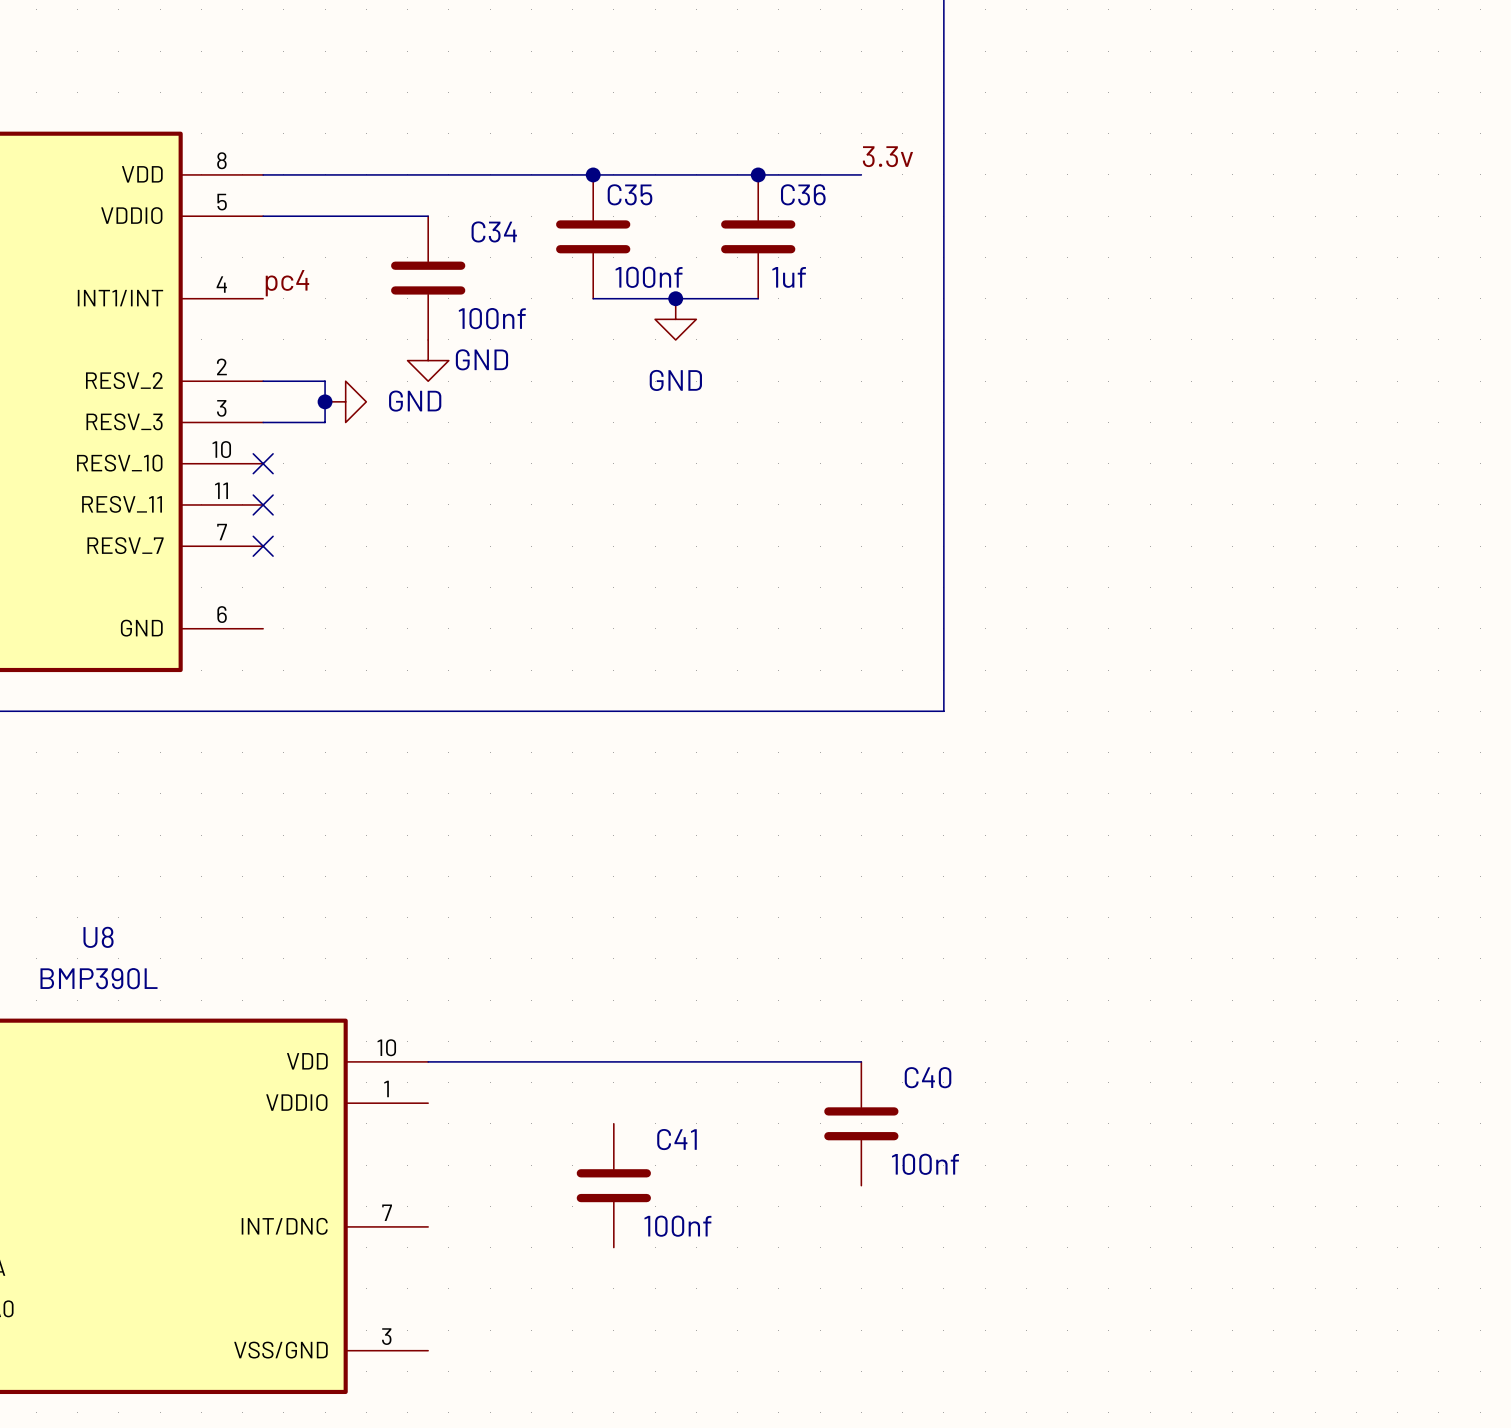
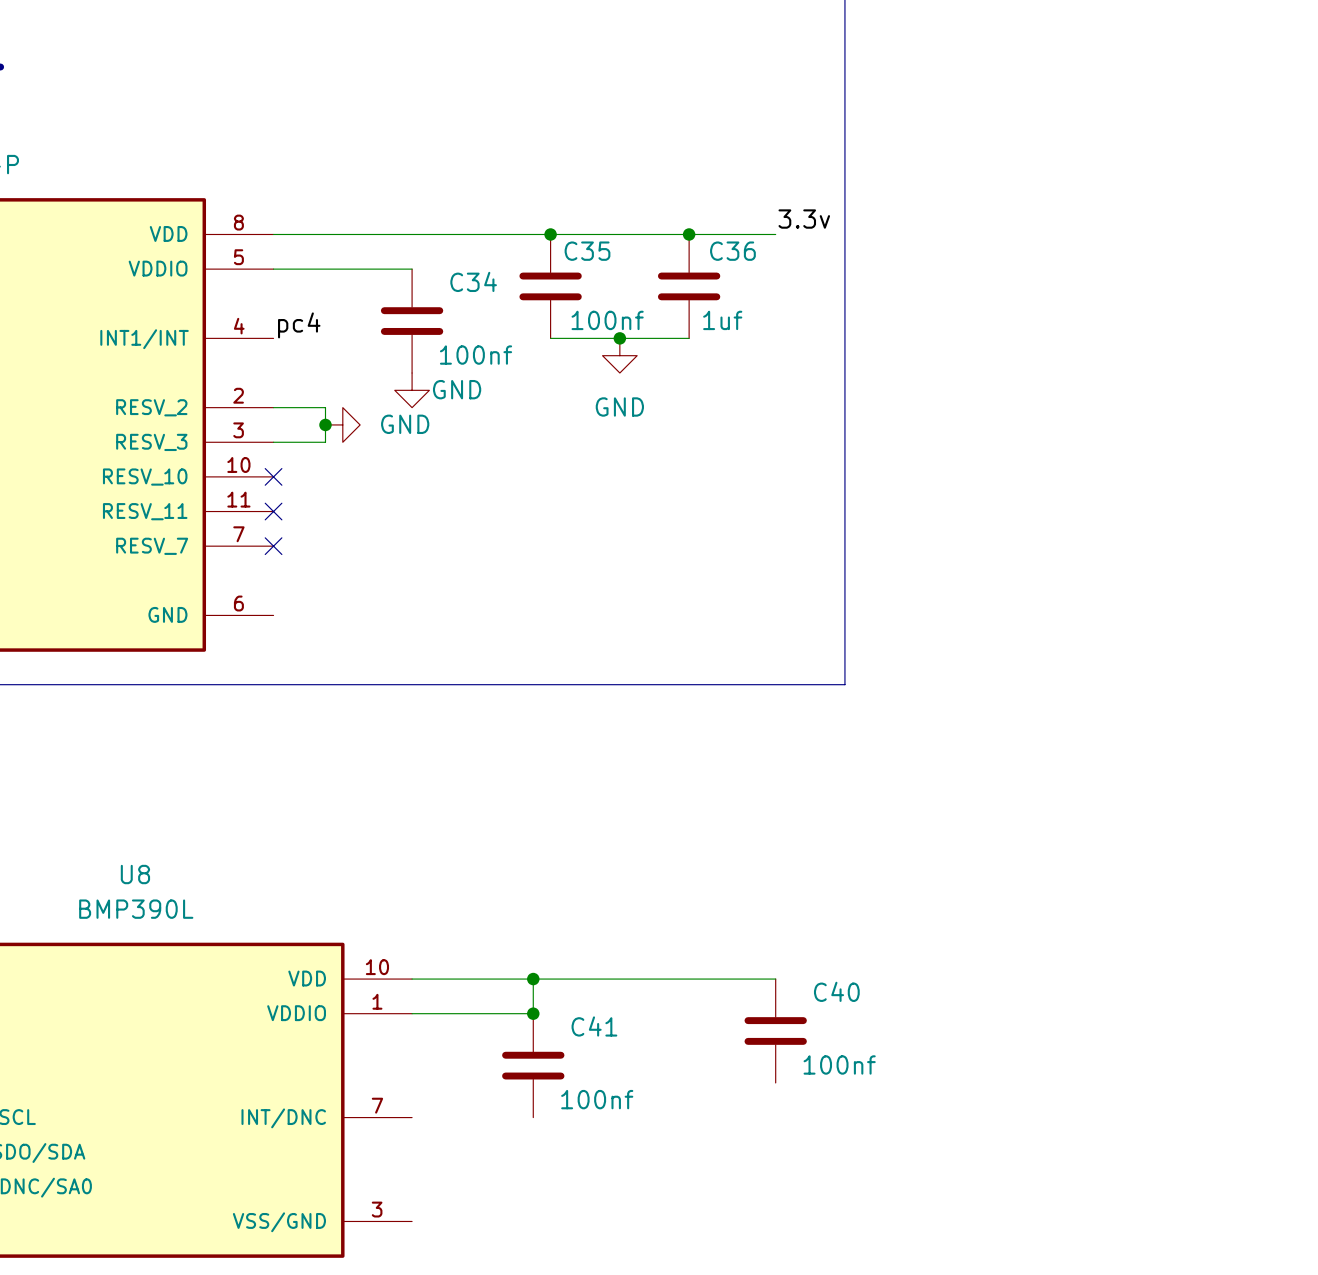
wire: none -> (533, 979) (533, 1013) (412, 1013)
junction: none -> (533, 979)
junction: none -> (533, 1013)
C41 position: (613, 1185) -> (533, 1065)

